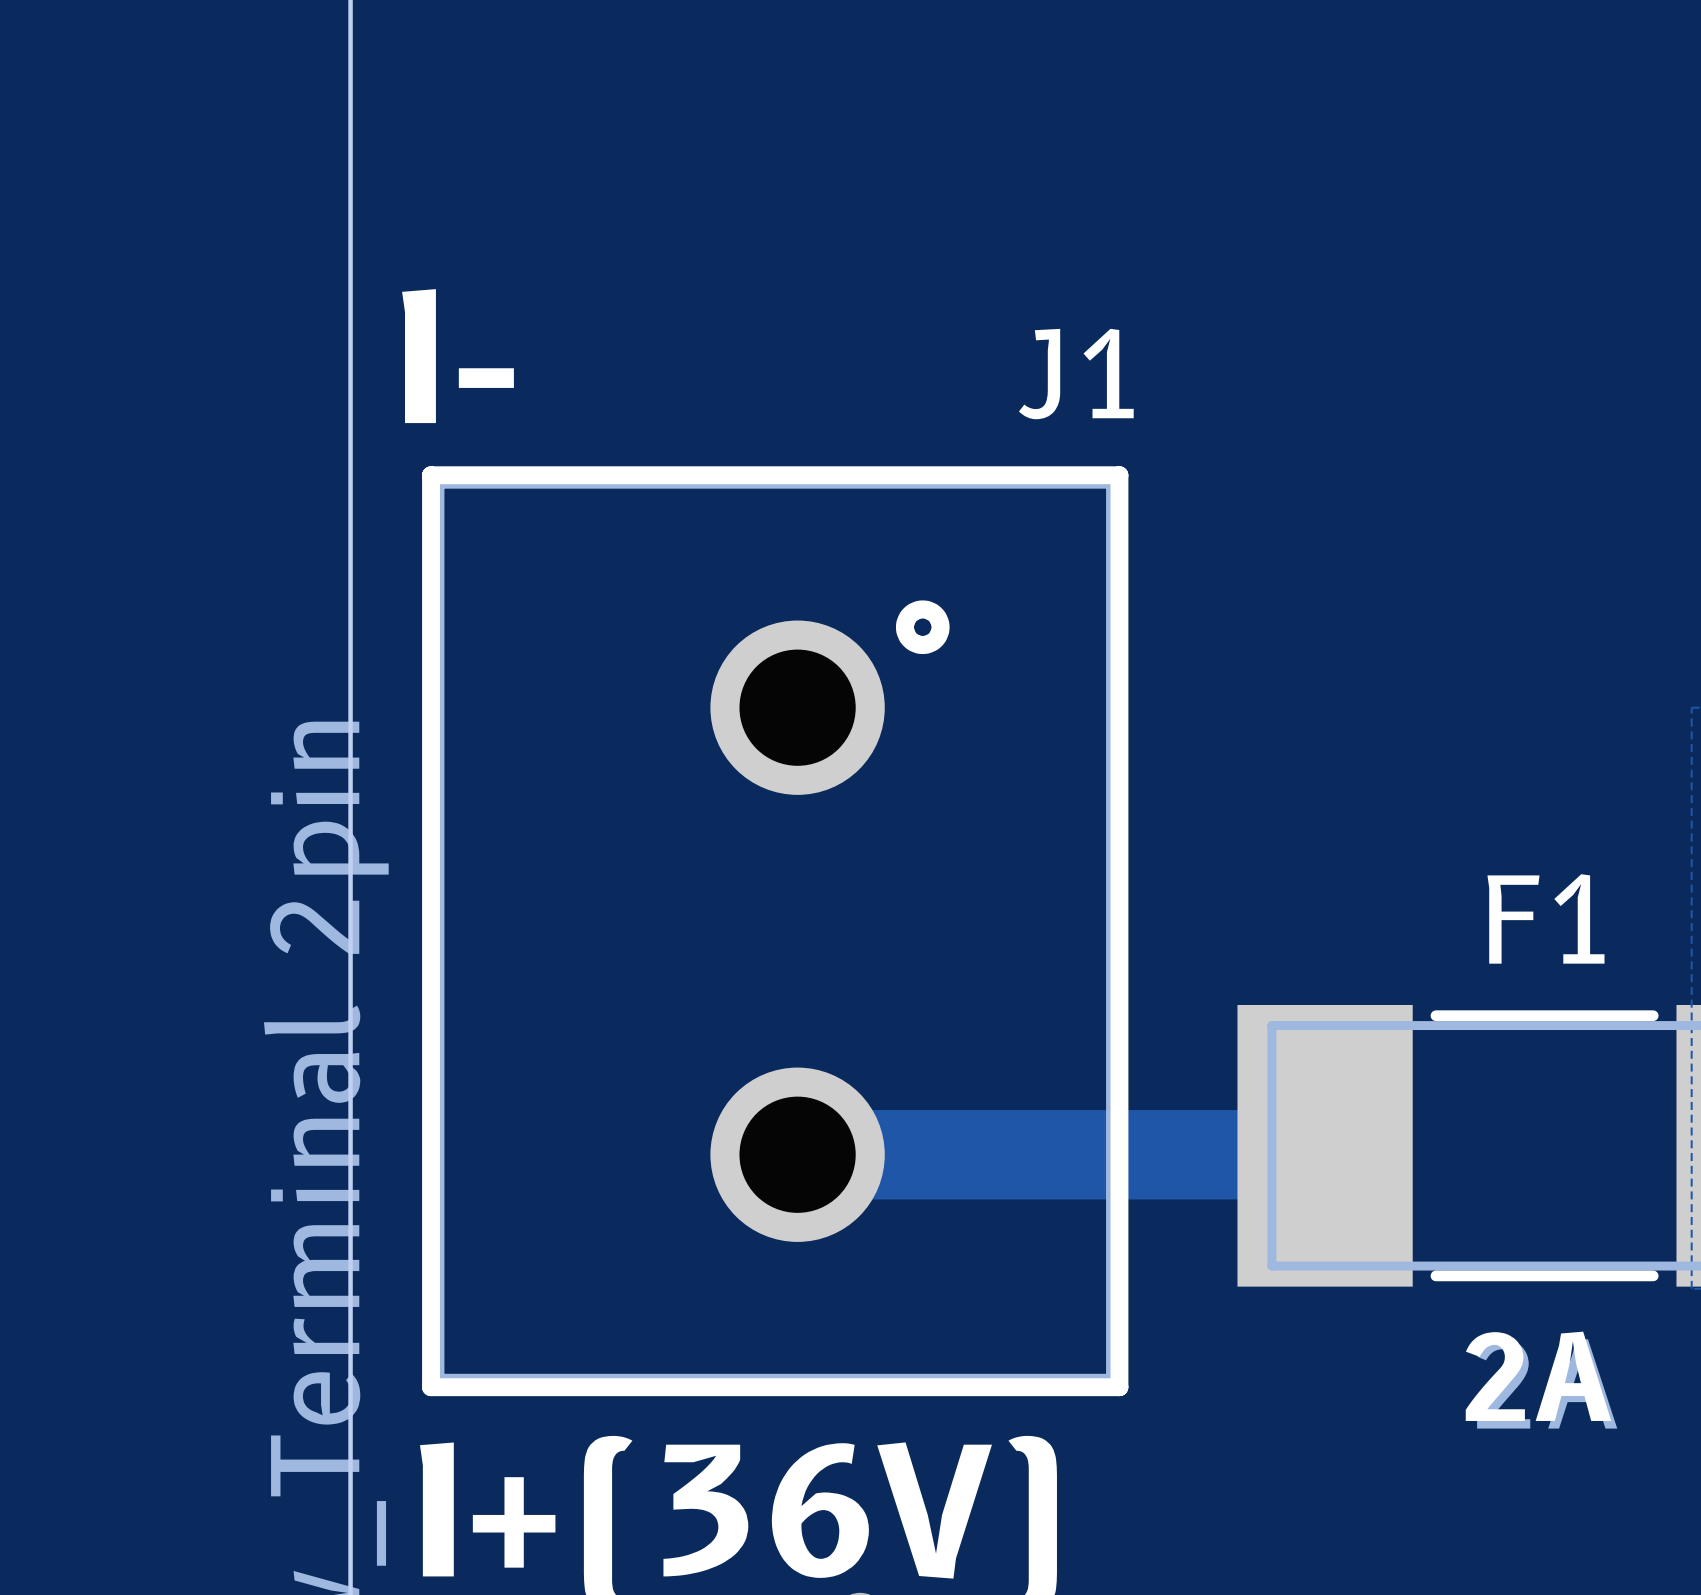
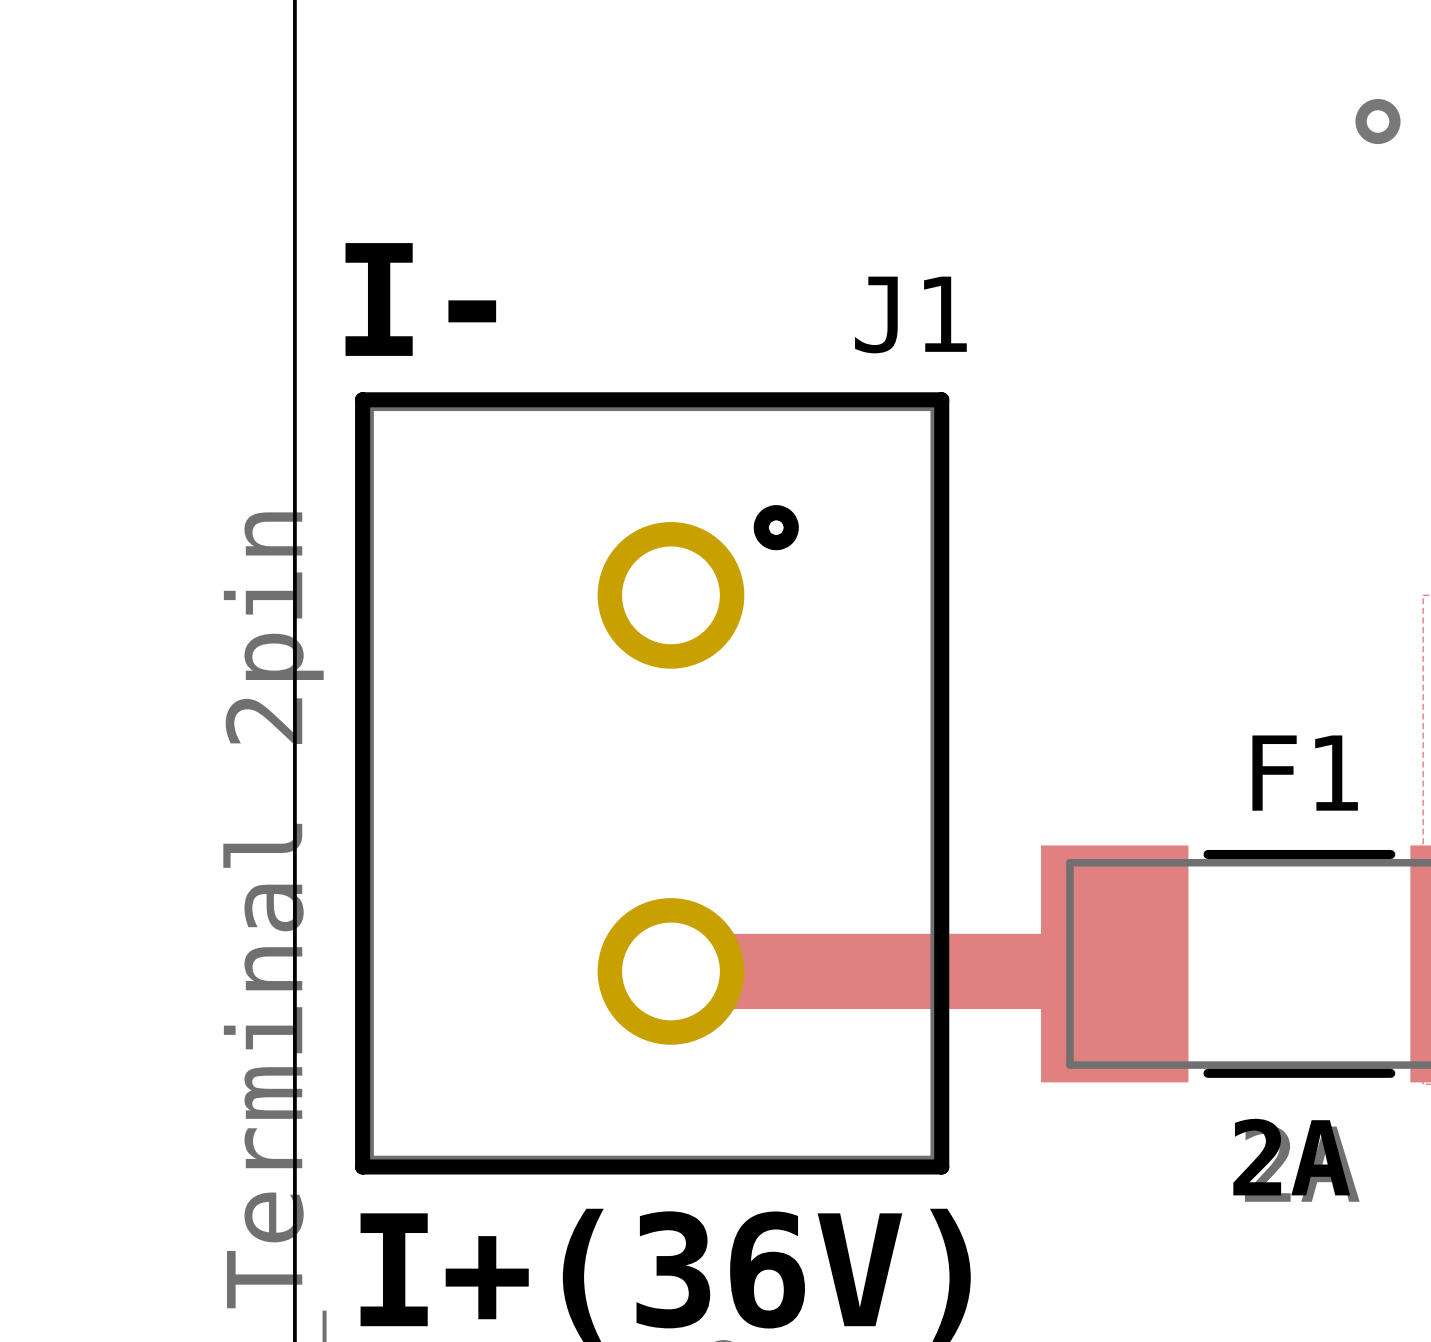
via: none -> (1378, 121)

